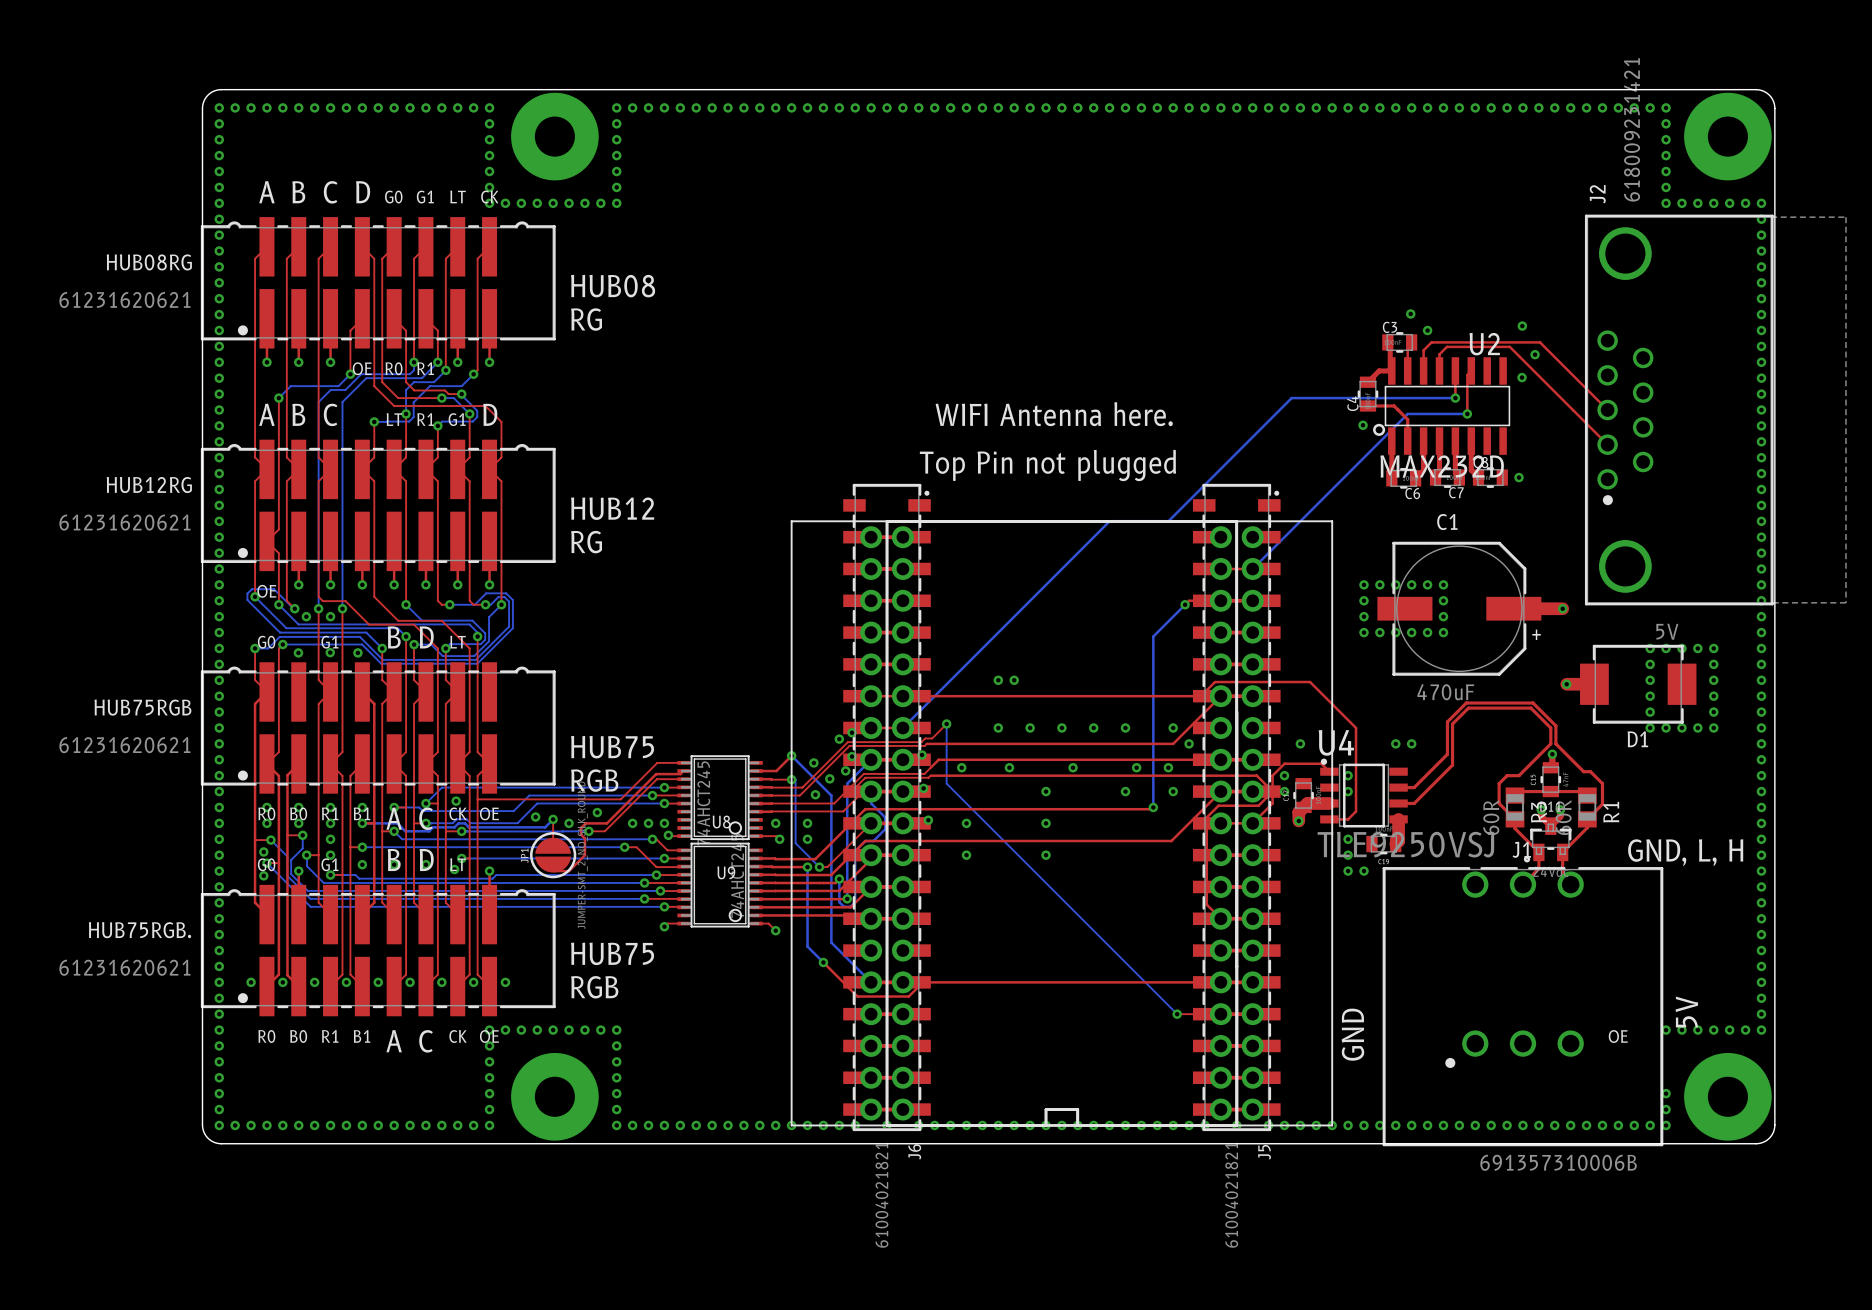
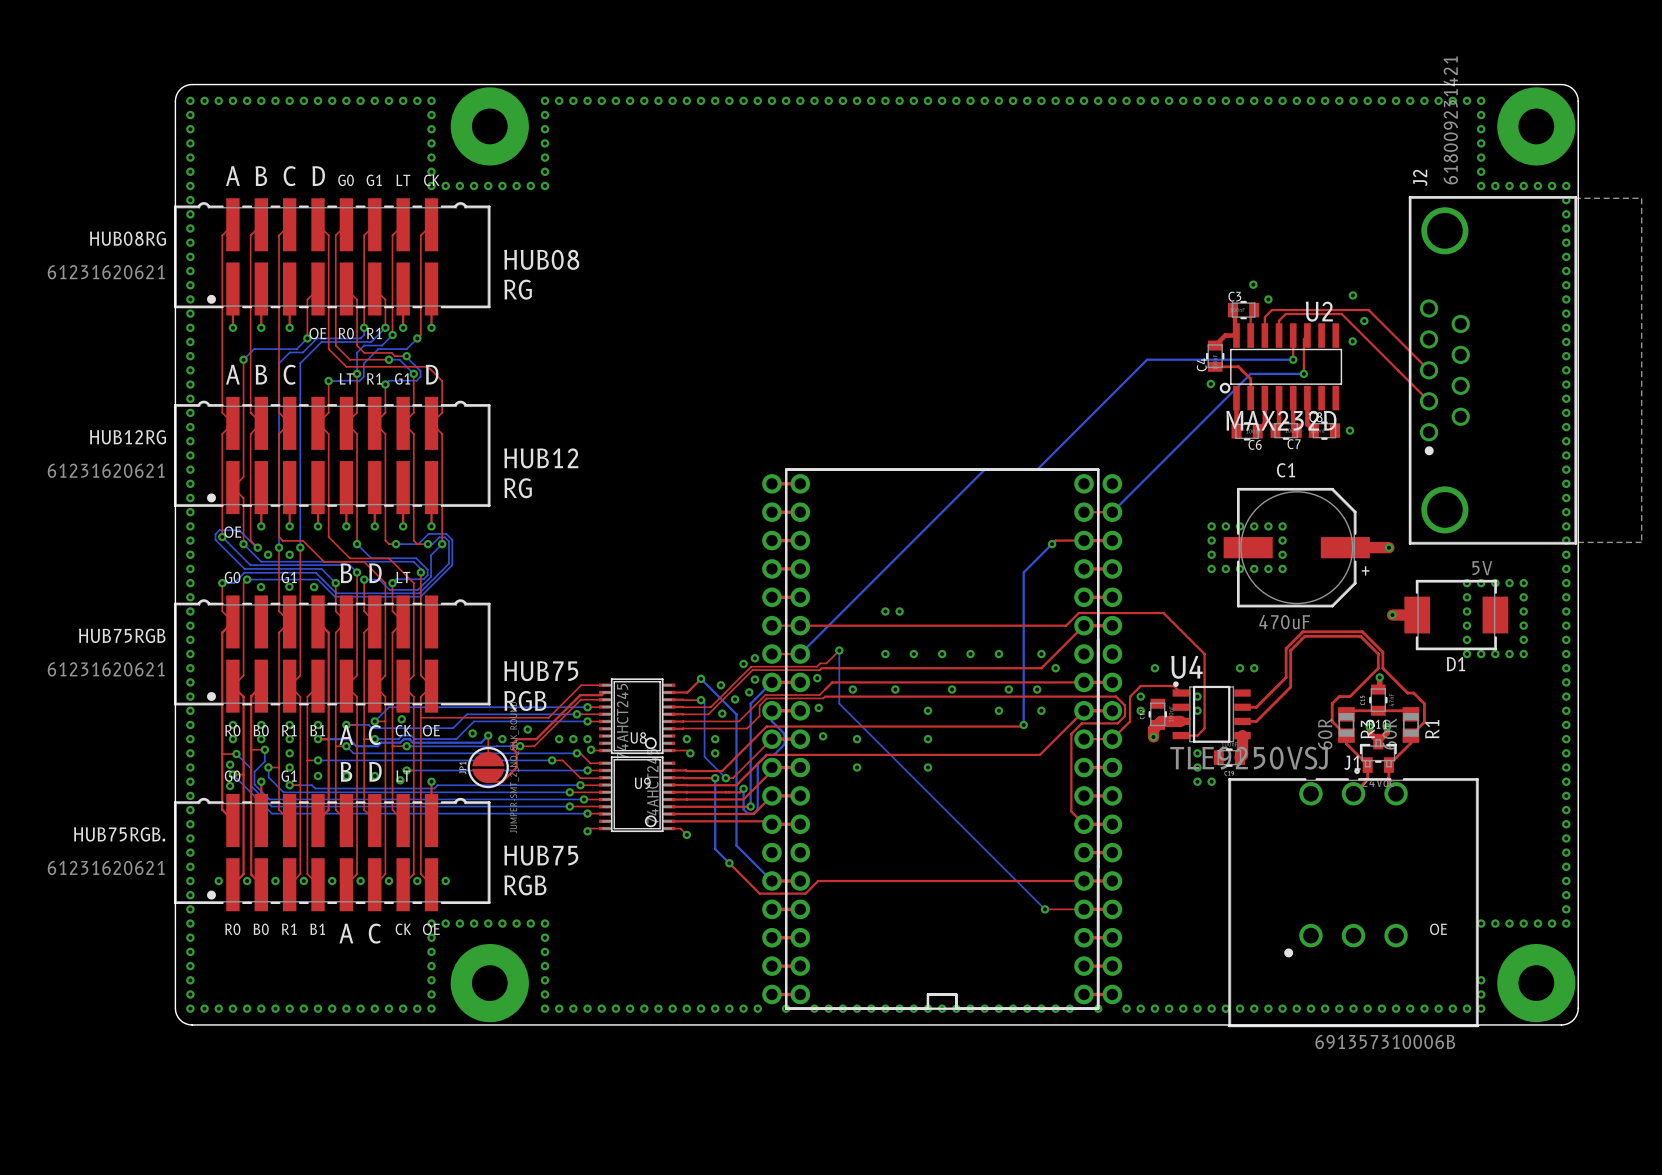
text: WIFI Antenna here. (1054, 414) -> none
text: Top Pin not plugged (1047, 465) -> none
line: (791, 521) (1332, 521) (1332, 1125) (791, 1125) (791, 521) -> none
J6: 61004021821 (887, 807) -> none
J5: 61004021821 (1236, 807) -> none
text: GND, L, H (1685, 852) -> none
text: 5V (1686, 1012) -> none
text: GND (1352, 1034) -> none

